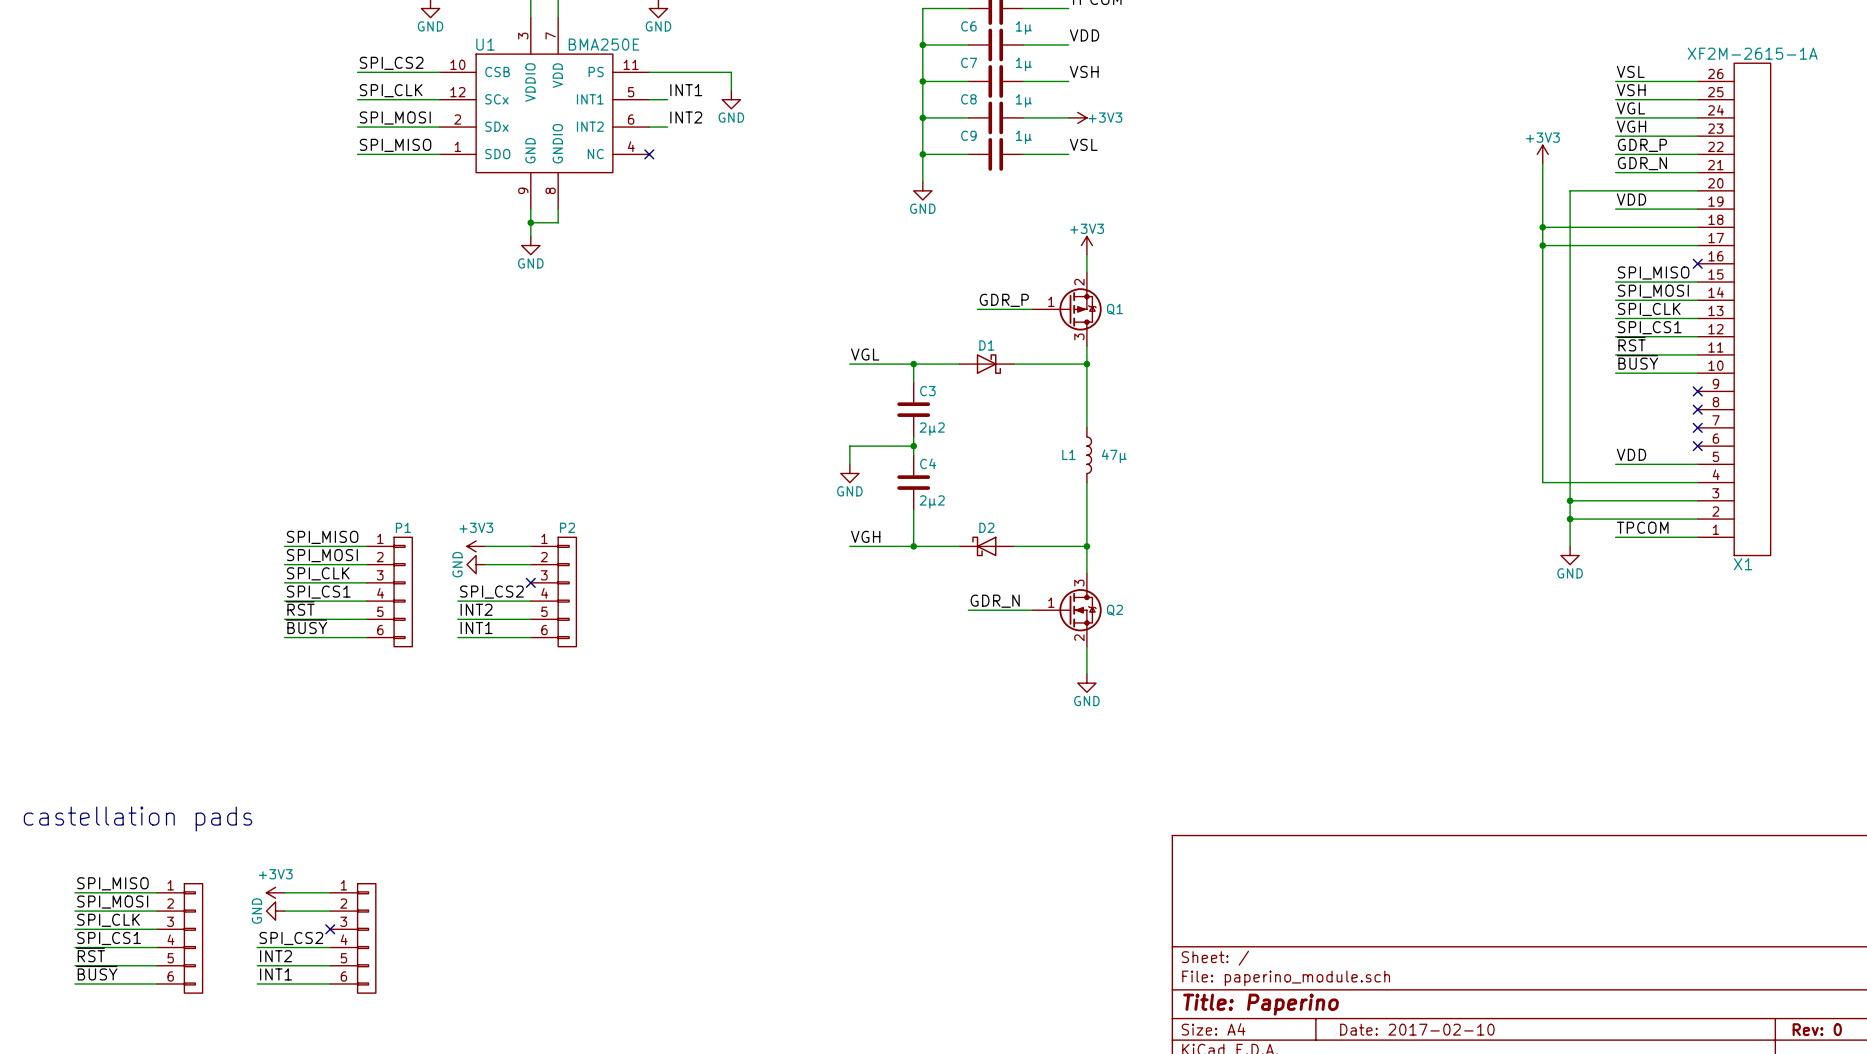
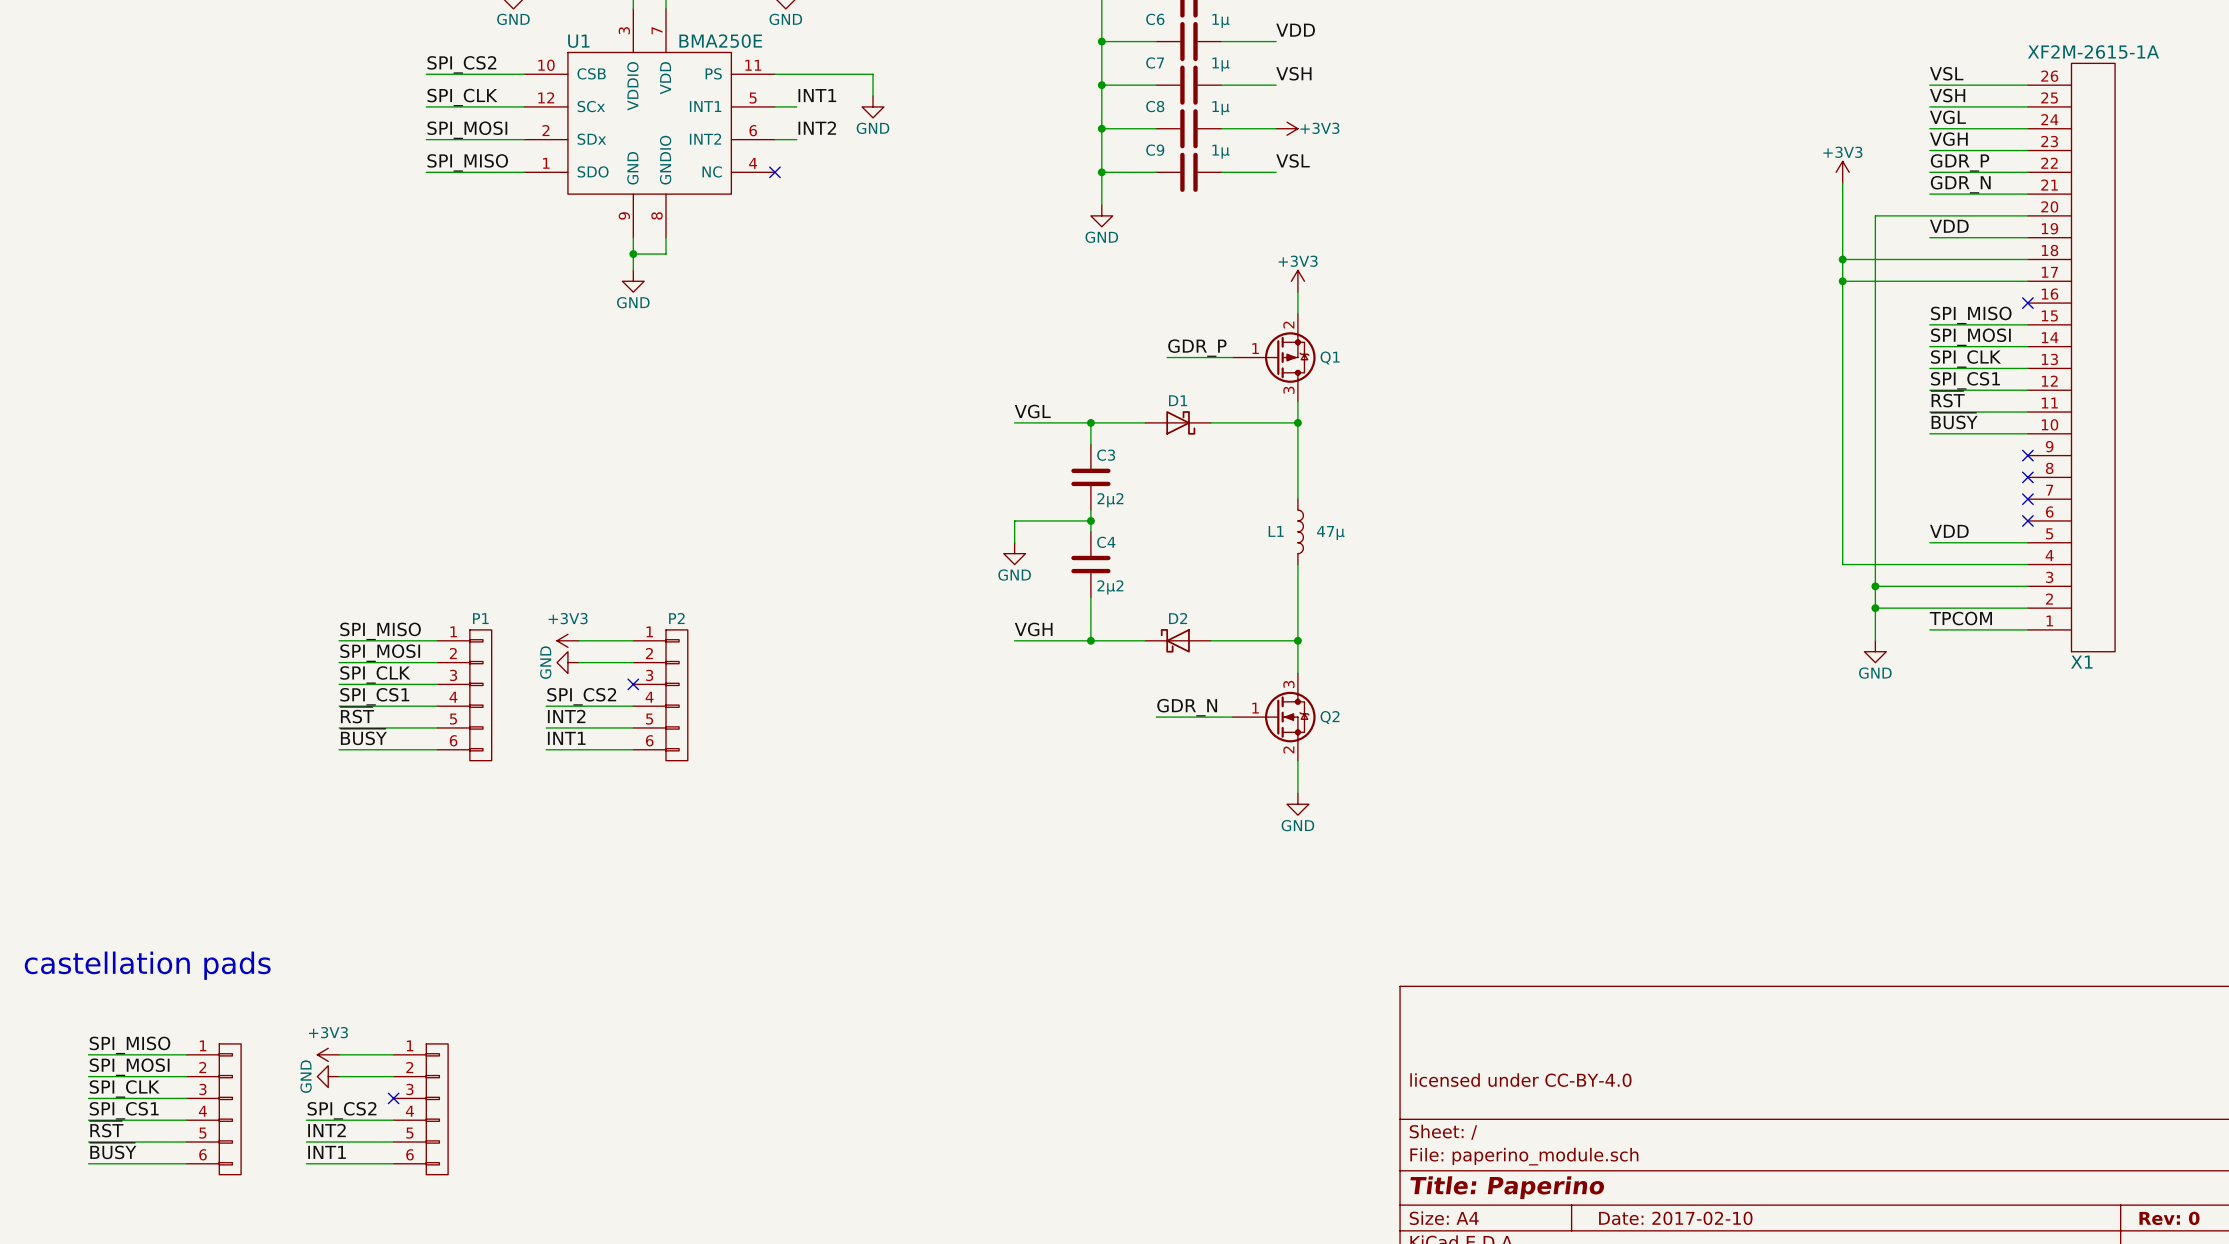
title block: none -> licensed under CC-BY-4.0 (1520, 1080)

